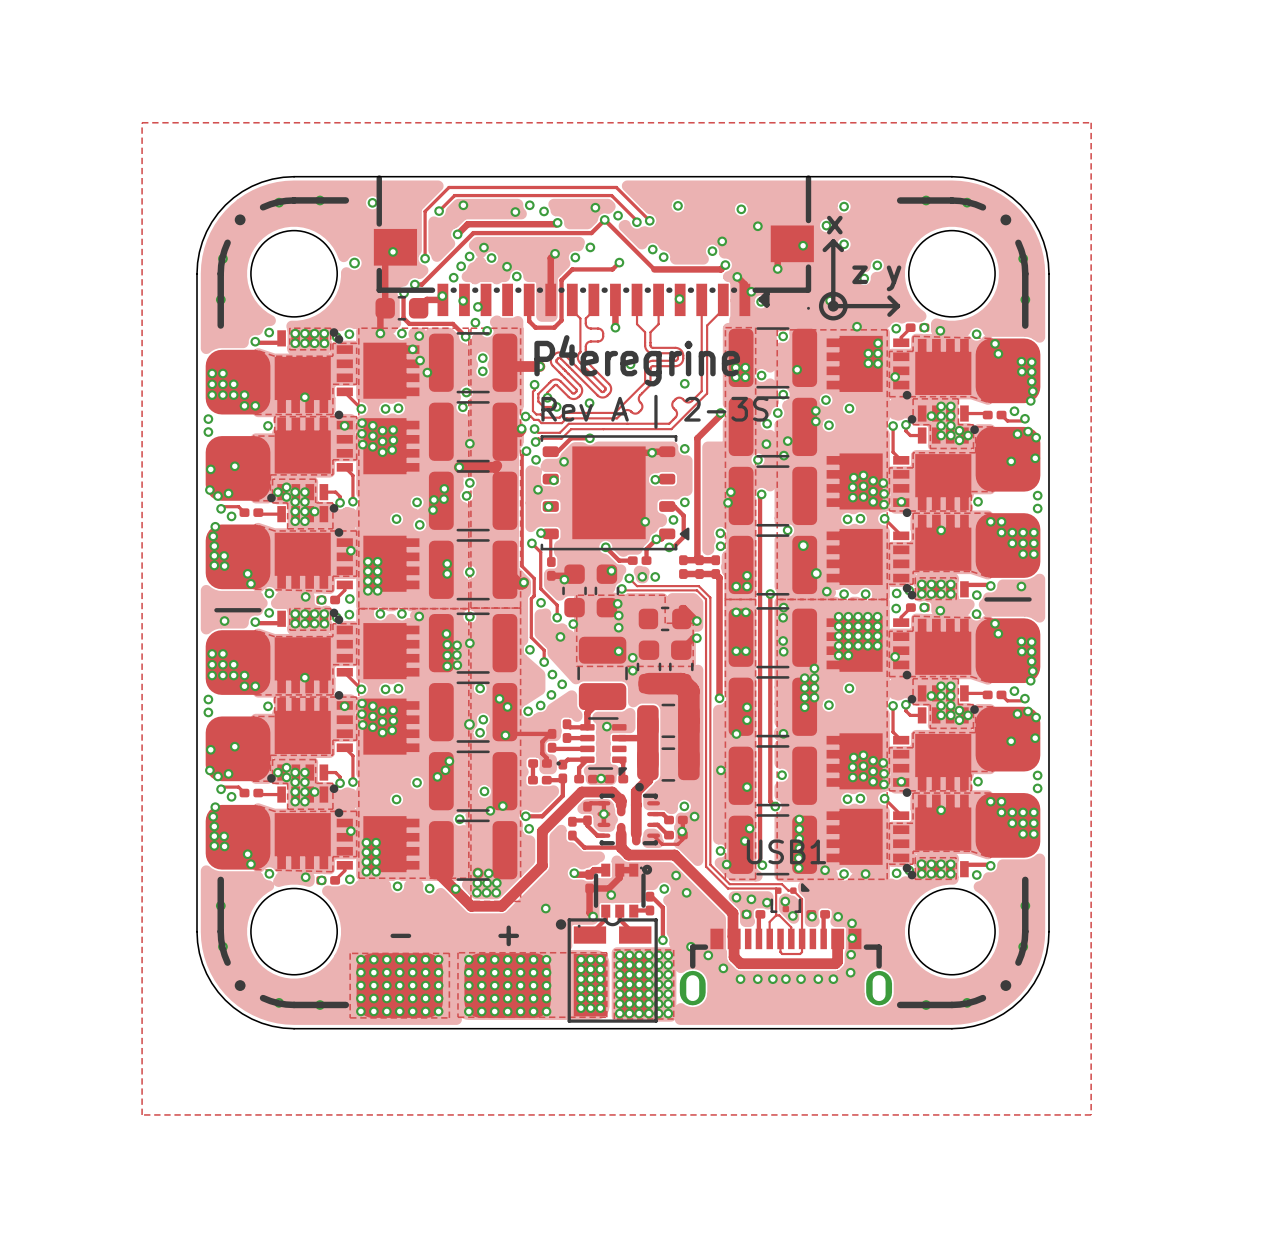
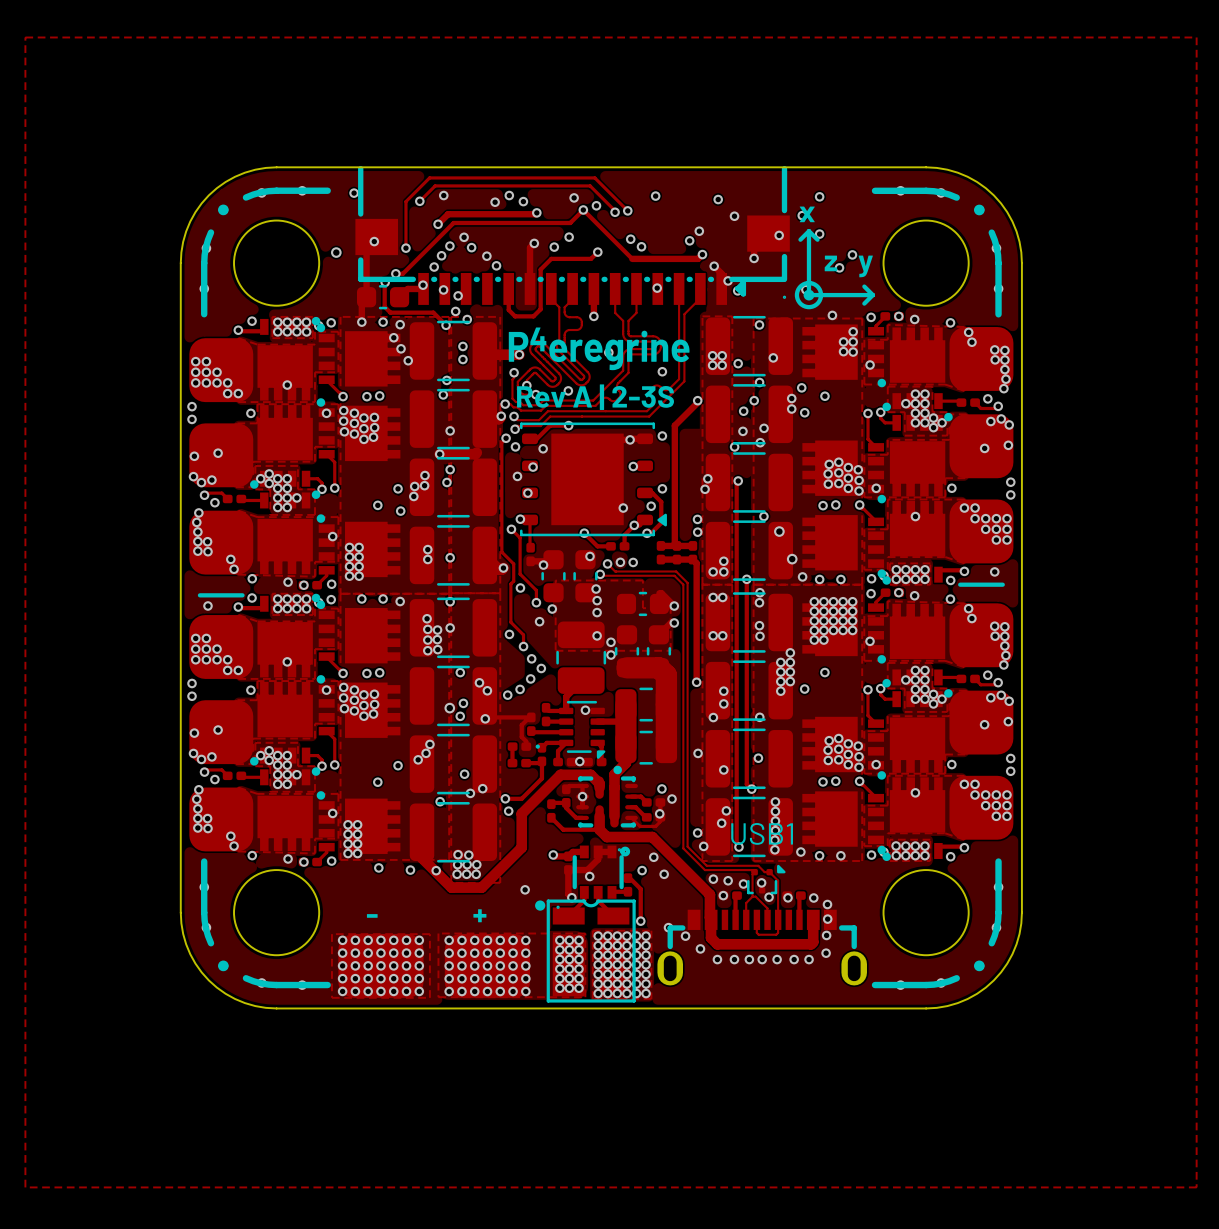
zone outline: (142, 122) (142, 1114) (1091, 1114) (1091, 122) (142, 122) -> (25, 37) (25, 1187) (1196, 1187) (1196, 37) (25, 37)

